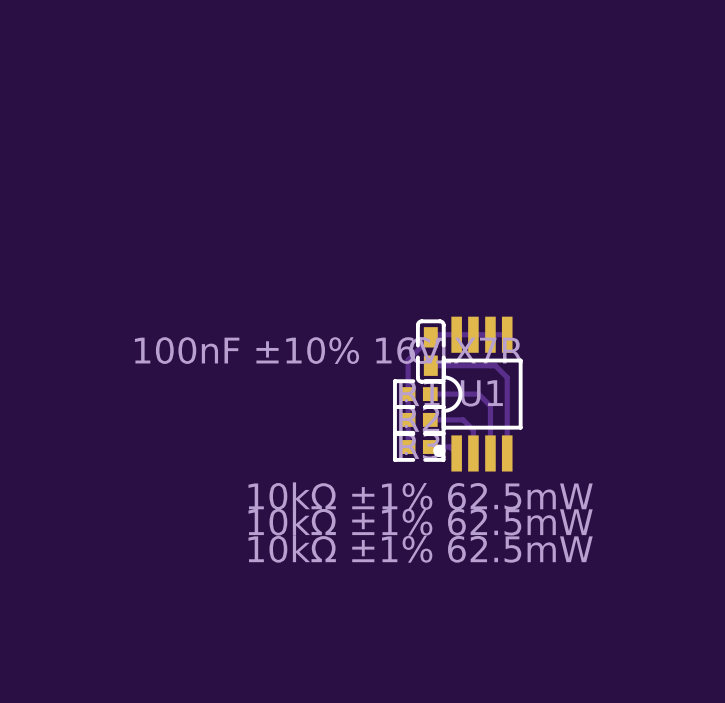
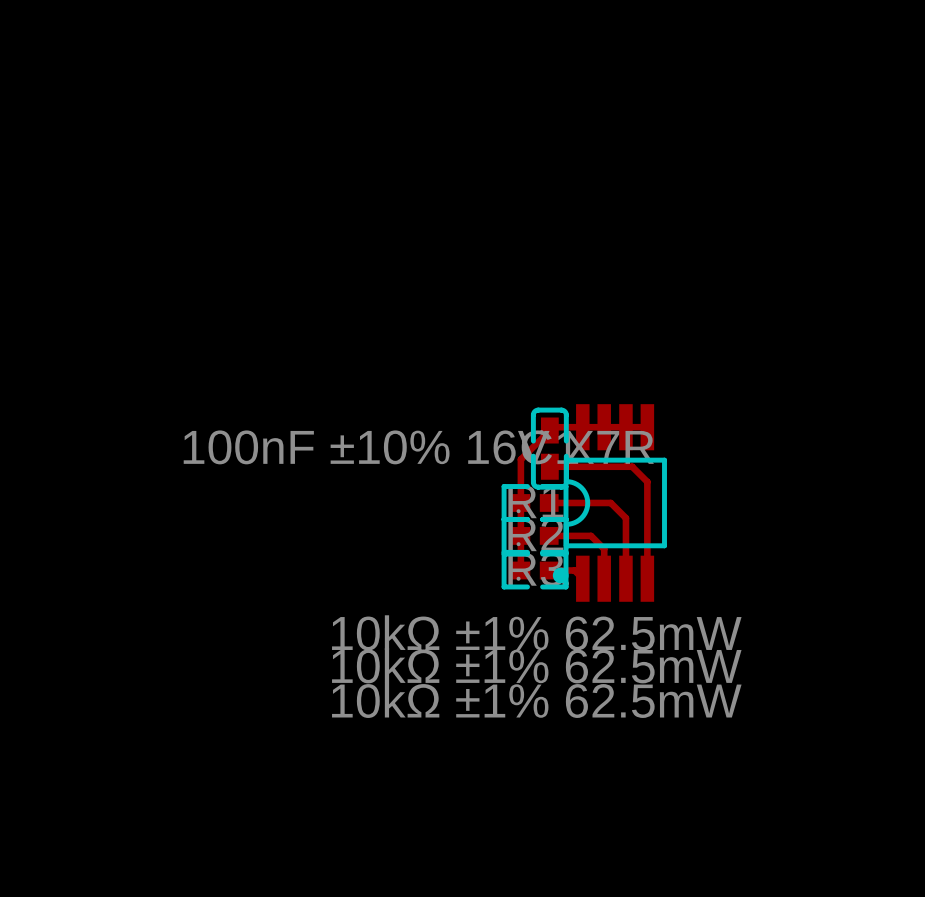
U1 name: U1 (481, 393) -> none

